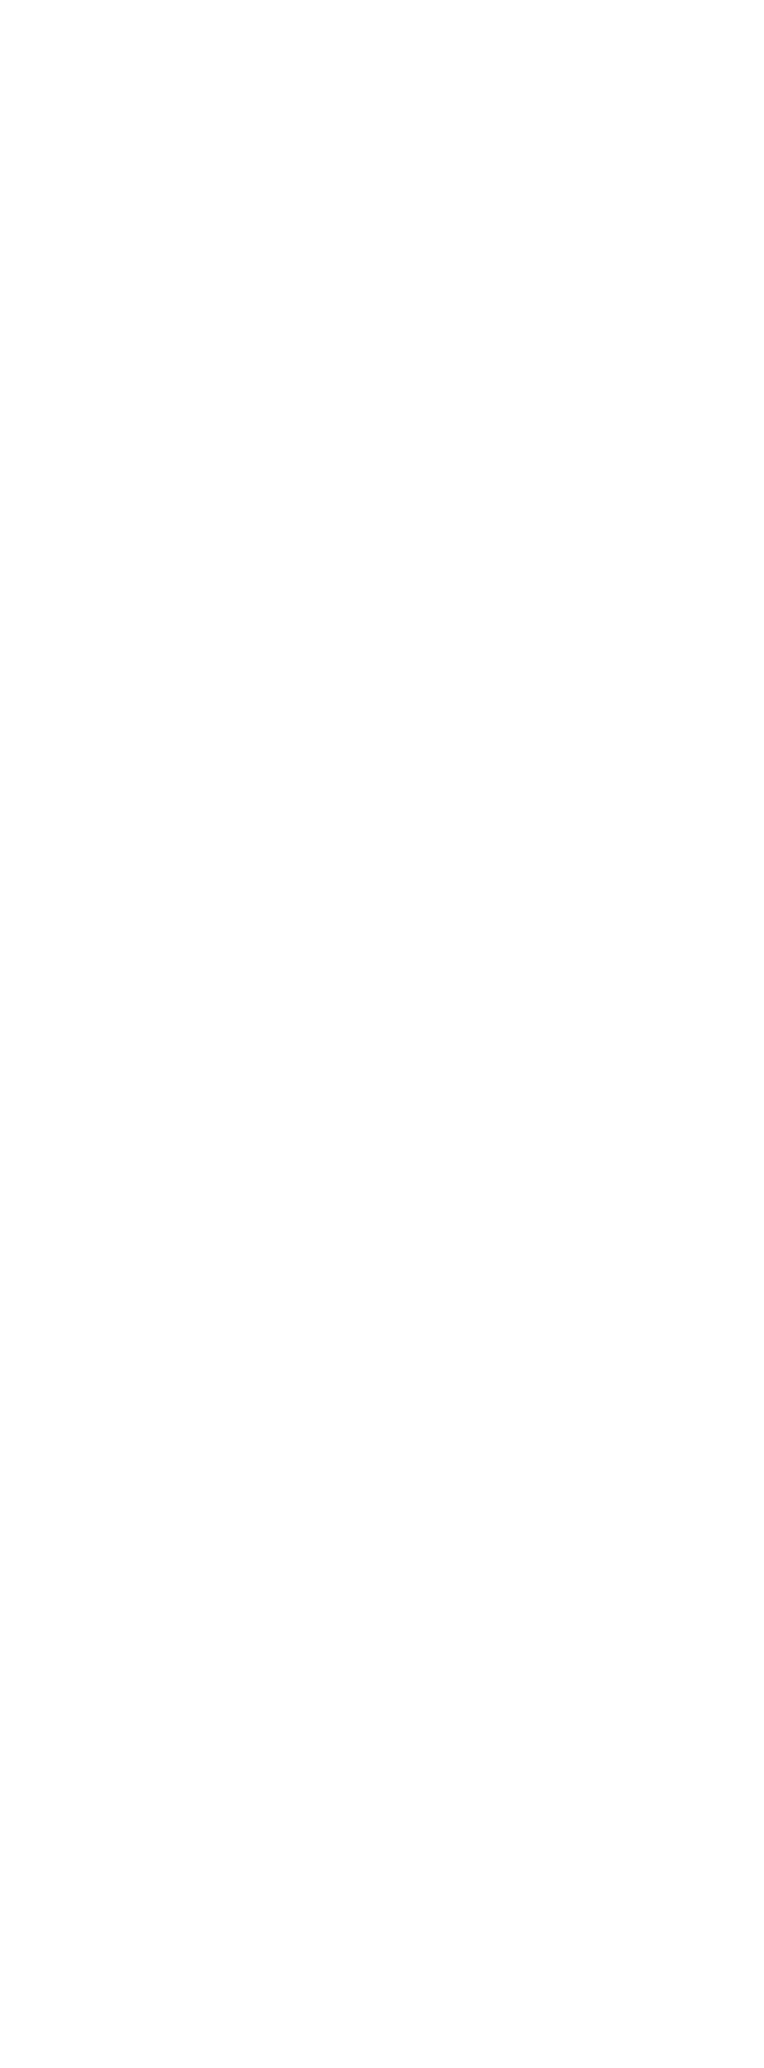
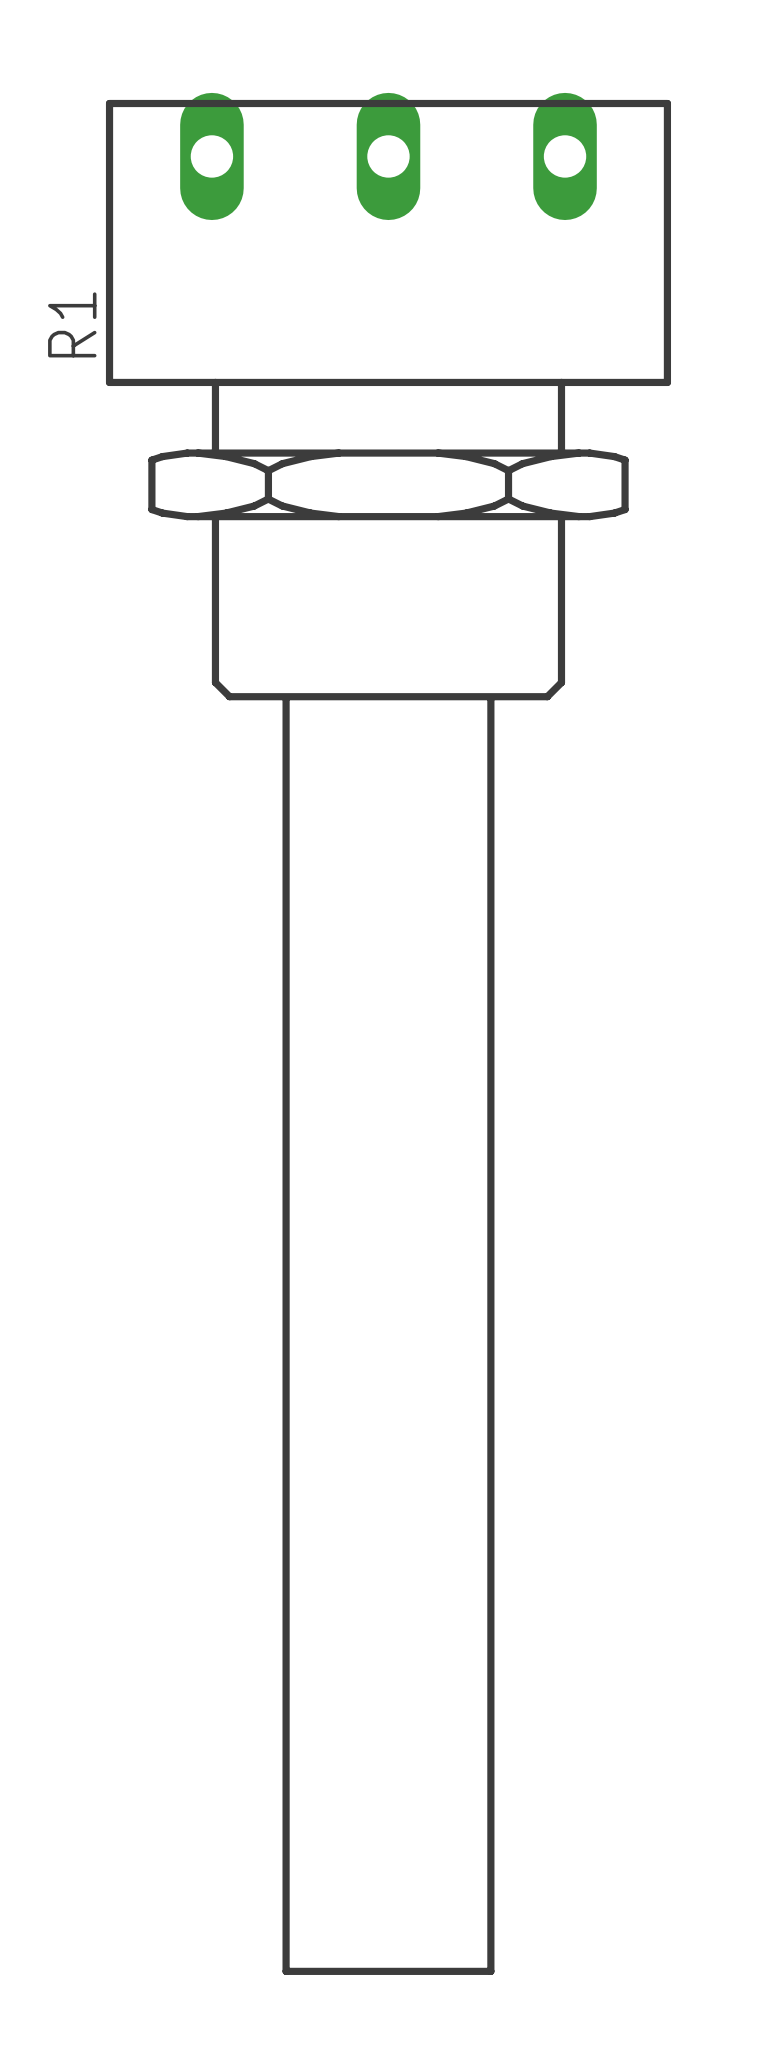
R1: none -> (388, 1033)

